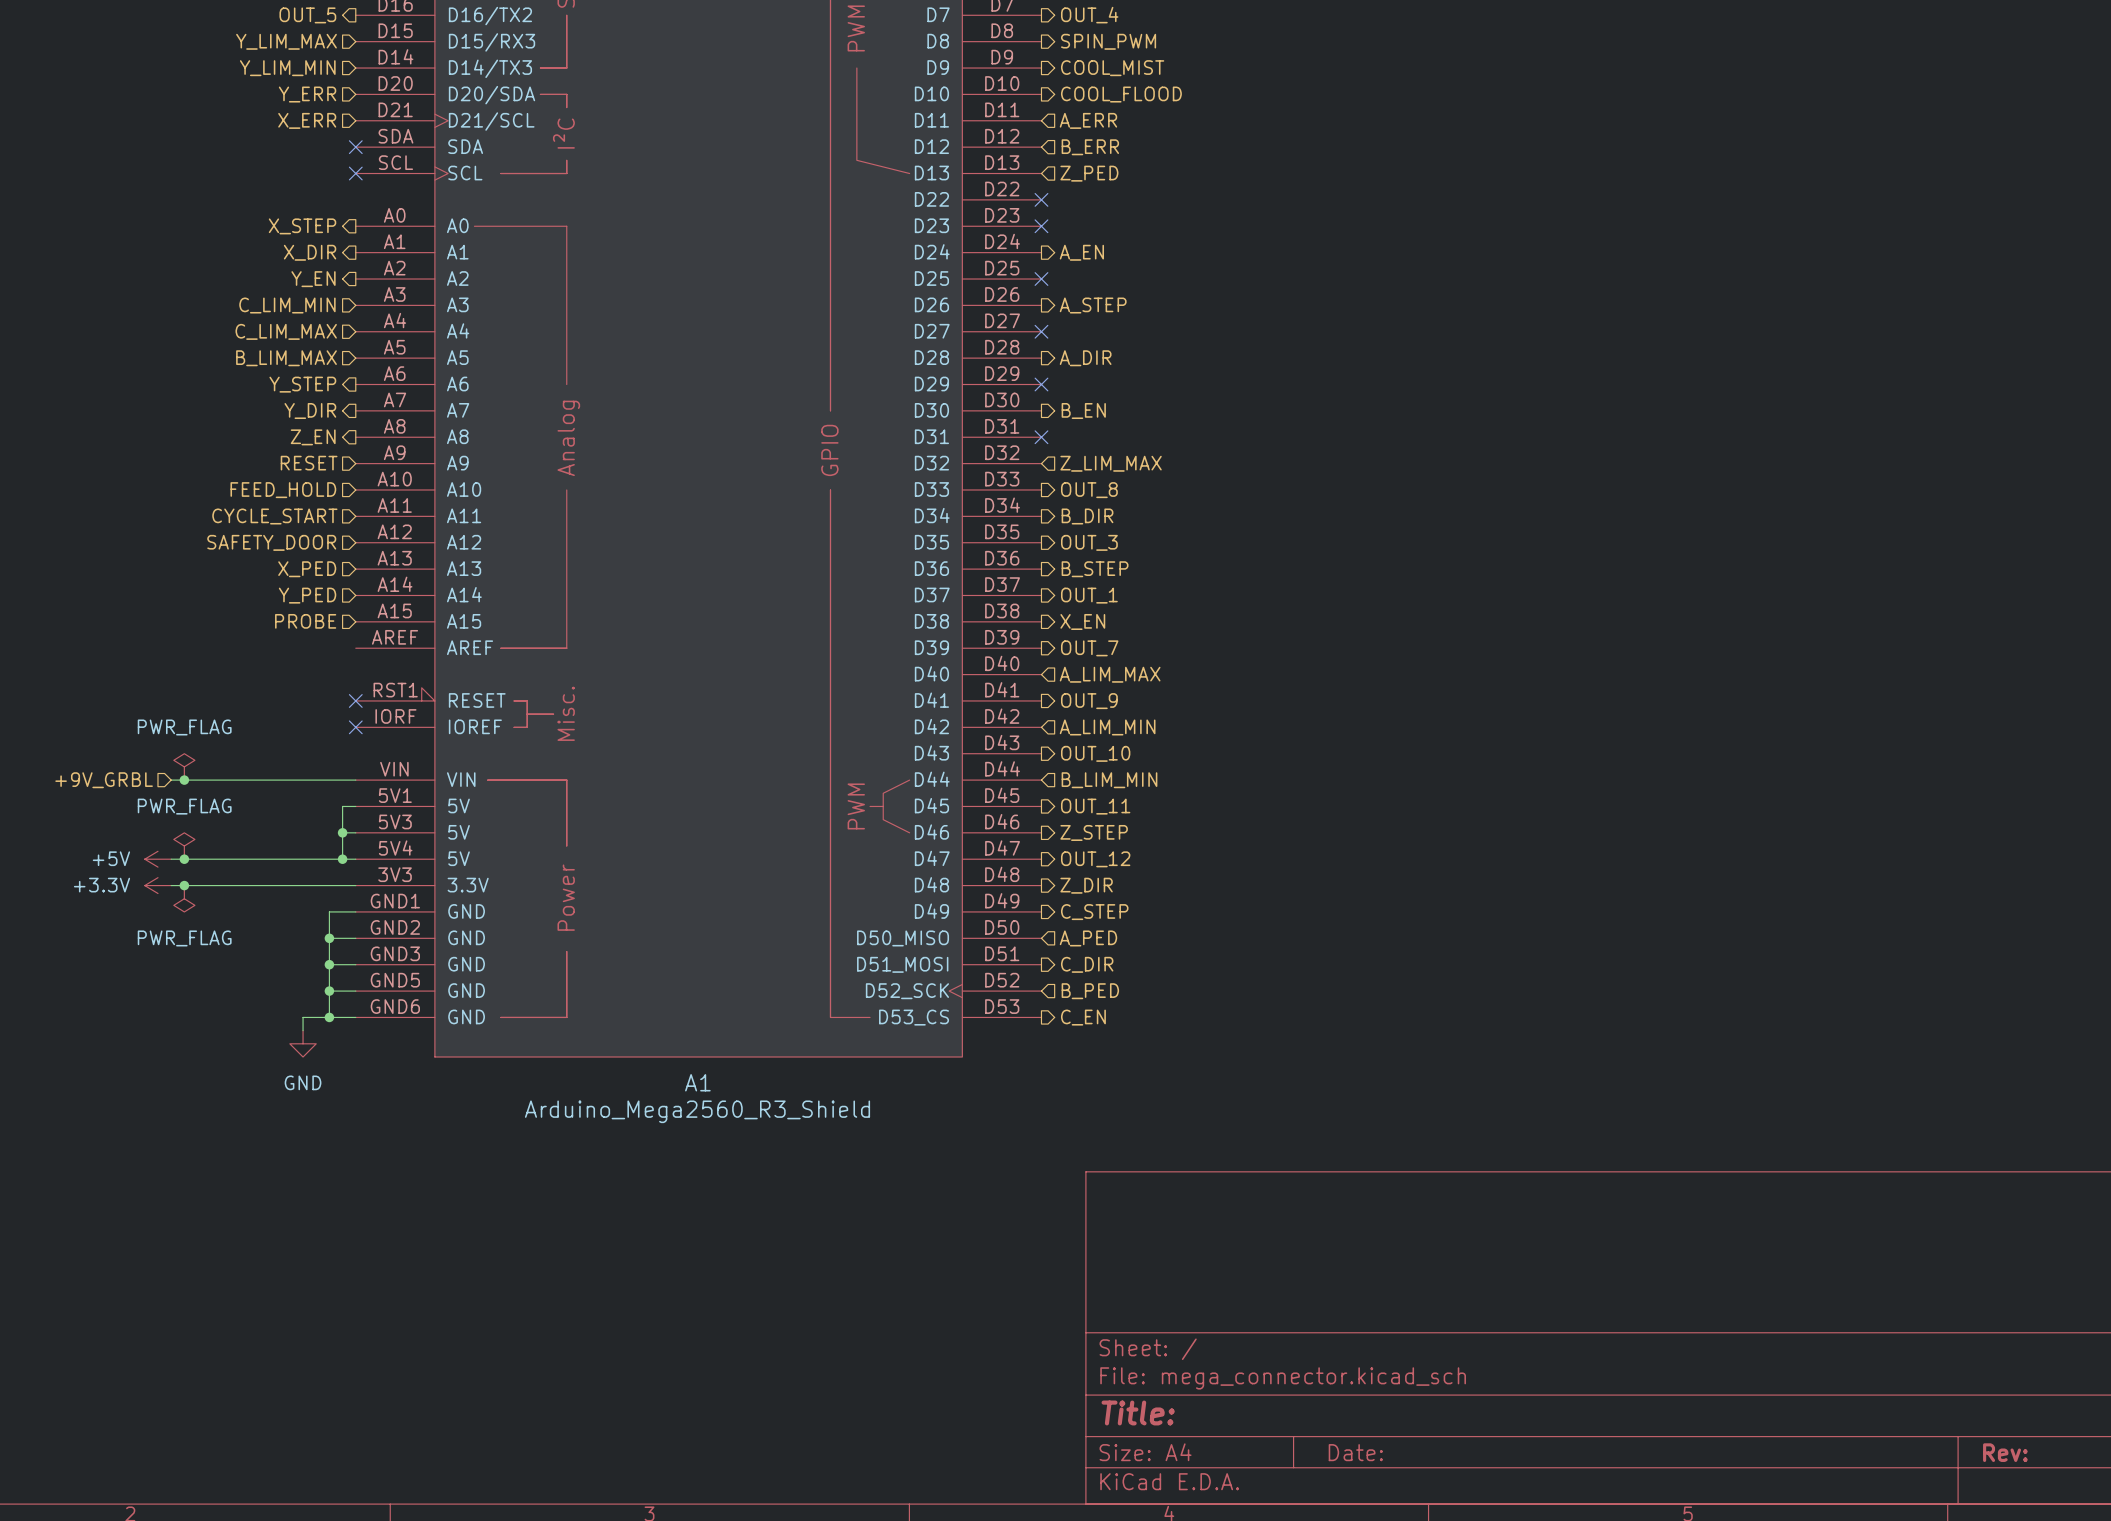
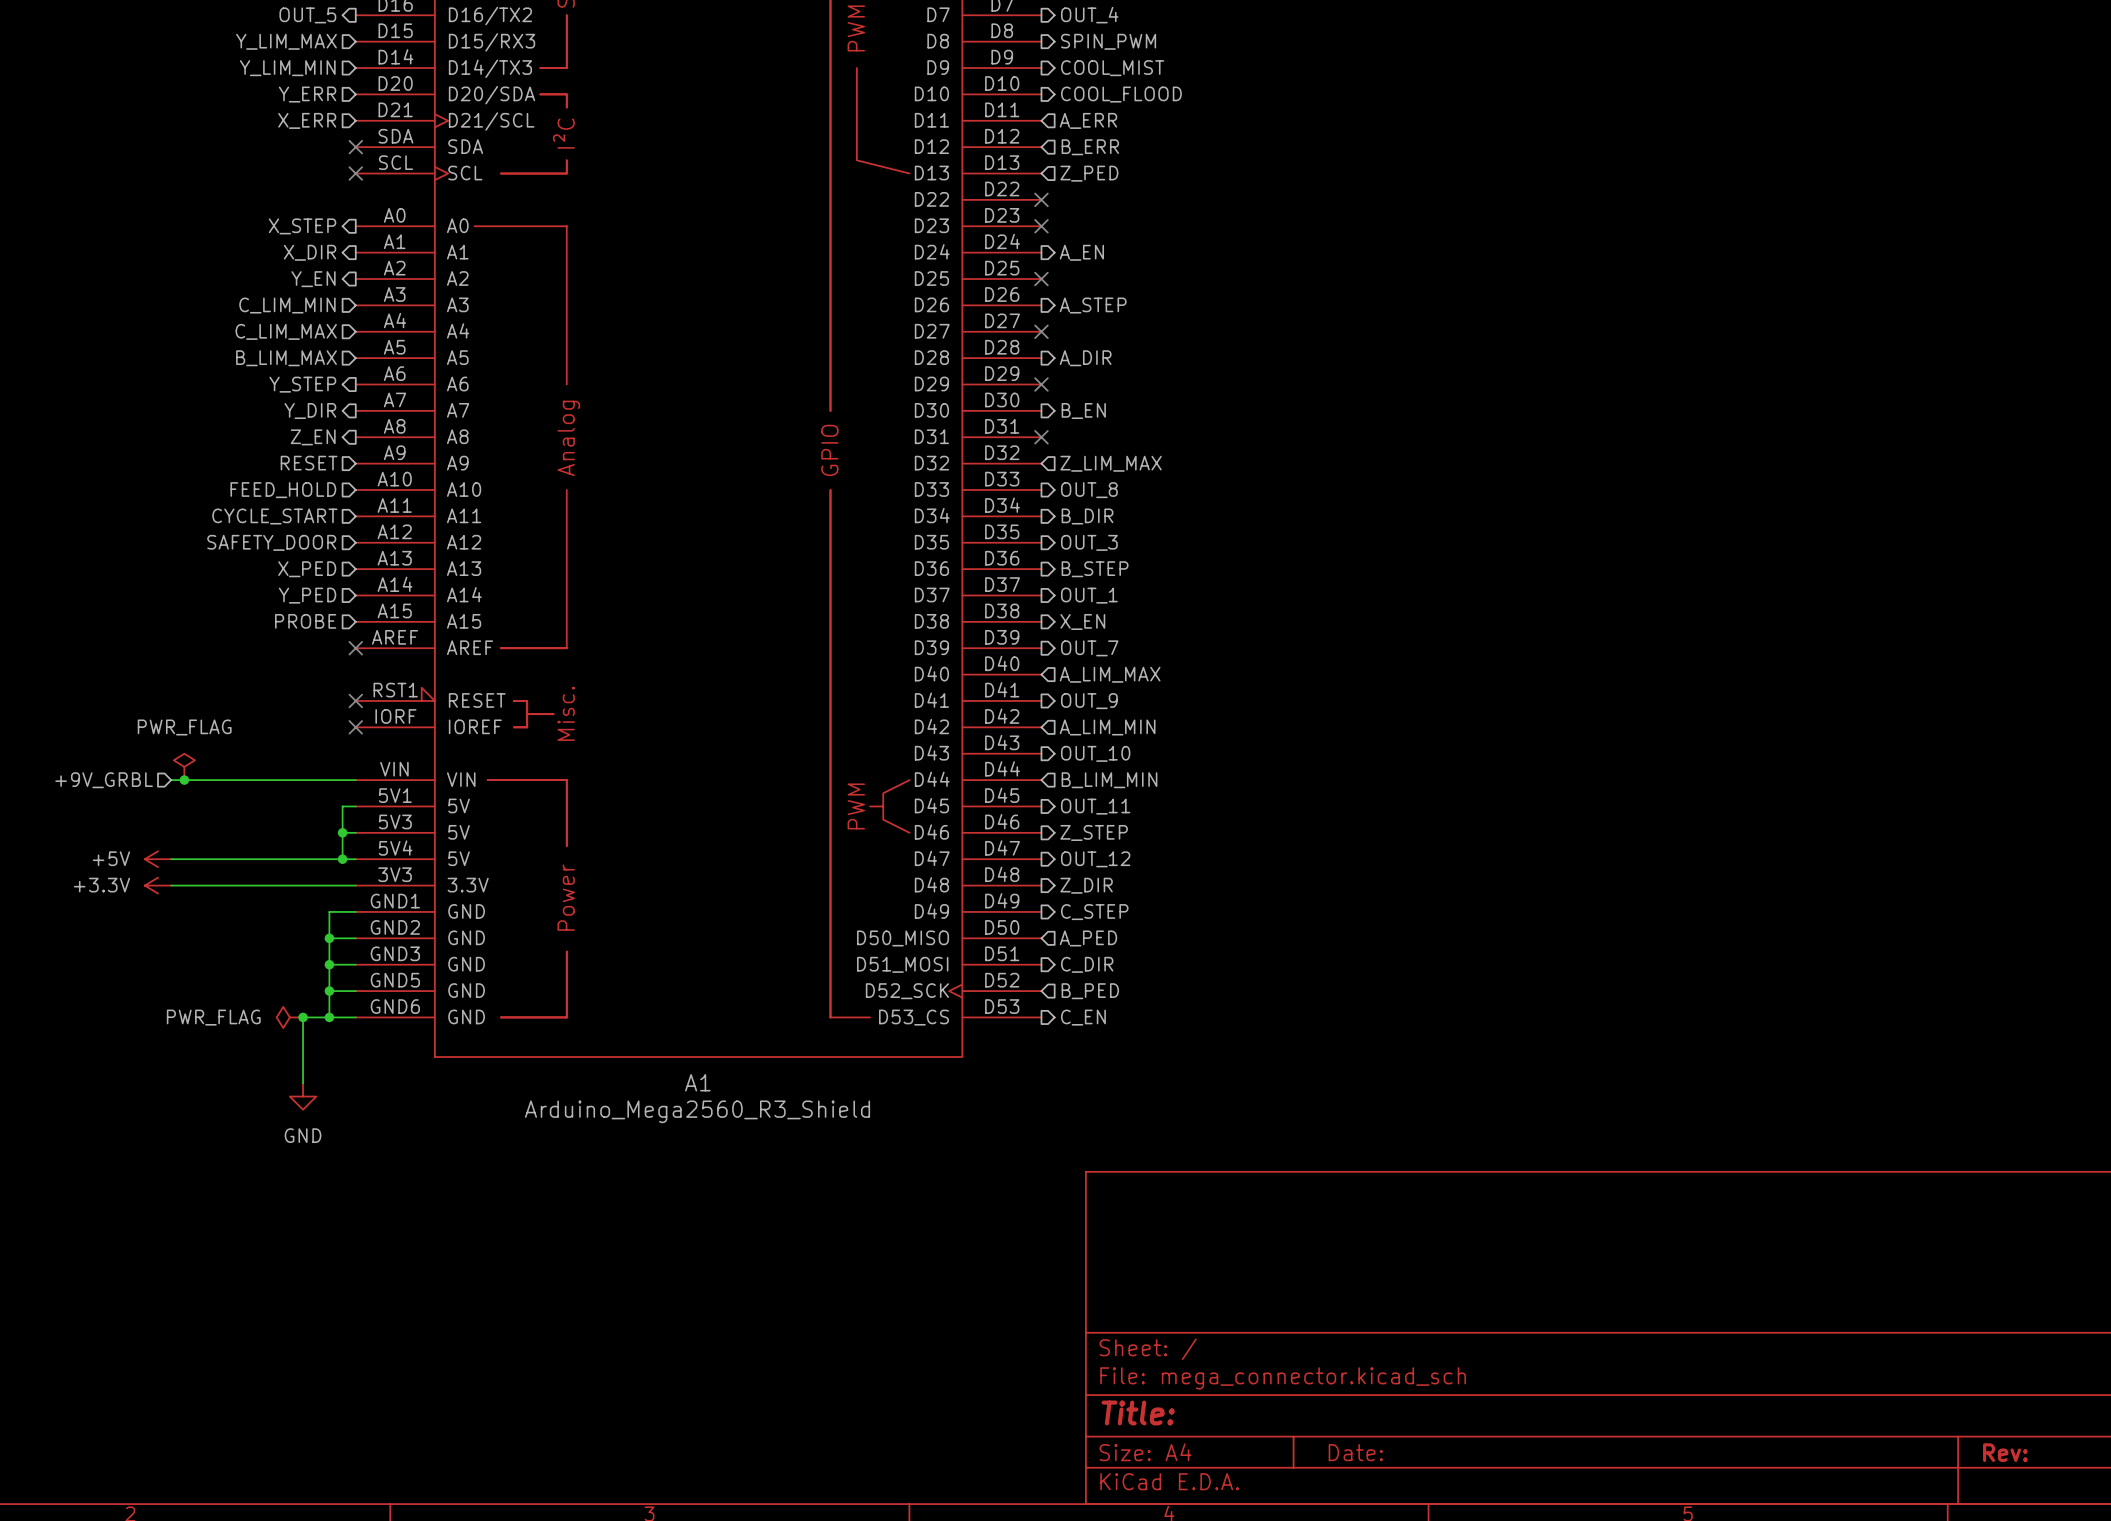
no-connect mark: none -> (355, 648)
power symbol: PWR_FLAG (184, 846) -> none
junction: (184, 859) -> none
junction: (184, 885) -> none
power symbol: PWR_FLAG (184, 898) -> none
power symbol: none -> PWR_FLAG (289, 1017)
junction: none -> (303, 1017)
wire: none -> (303, 1030) (303, 1083)
power symbol position: GND (303, 1043) -> GND (303, 1096)

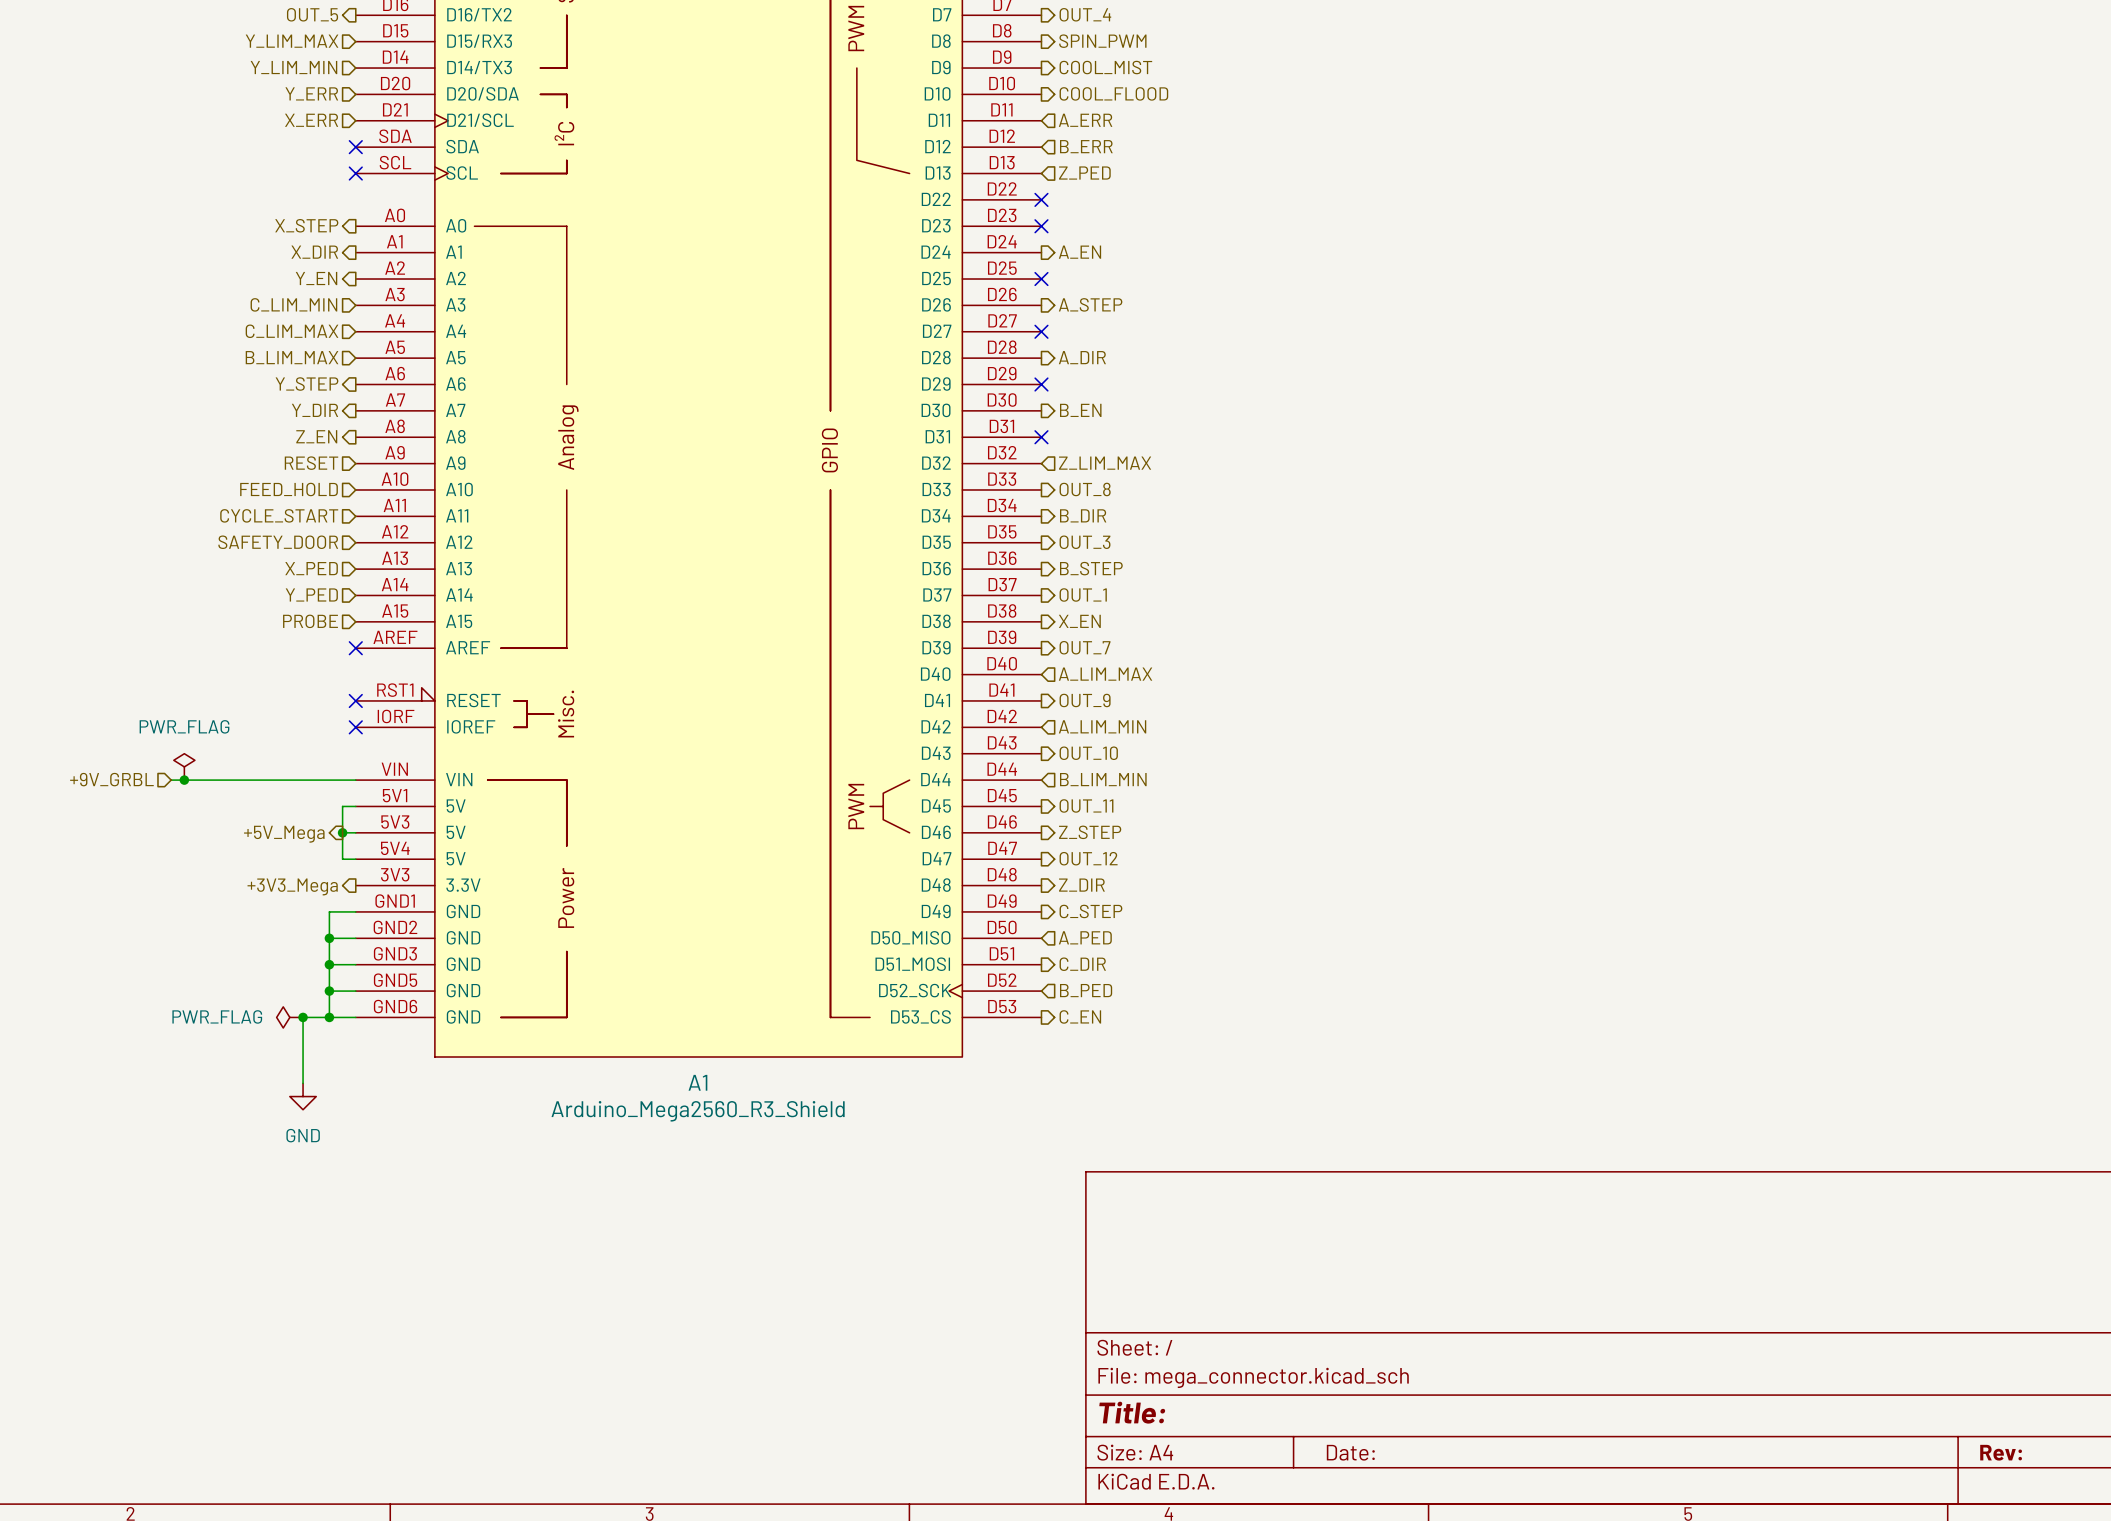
hierarchical label: none -> +5V_Mega (284, 834)
power symbol: +5V (157, 859) -> none
wire: (171, 859) (342, 859) -> none
junction: (342, 859) -> none
power symbol: +3.3V (157, 885) -> none
wire: (171, 885) (355, 885) -> none
hierarchical label: none -> +3V3_Mega (292, 886)

